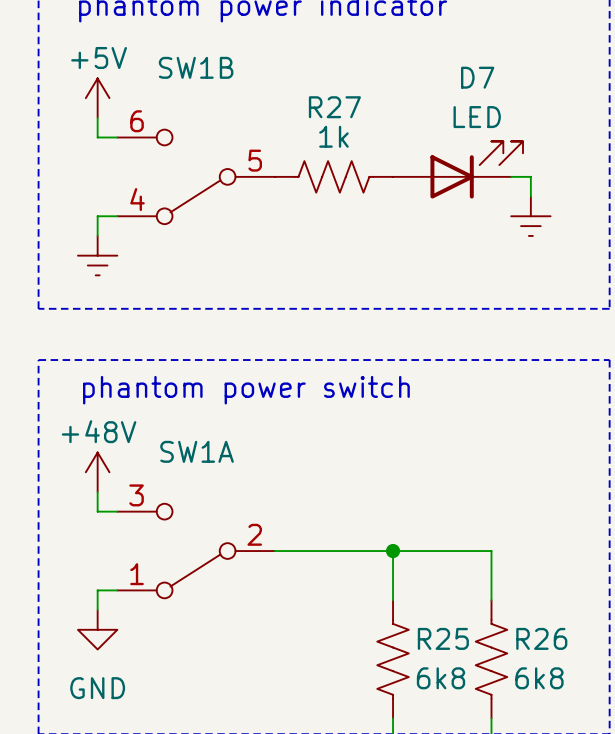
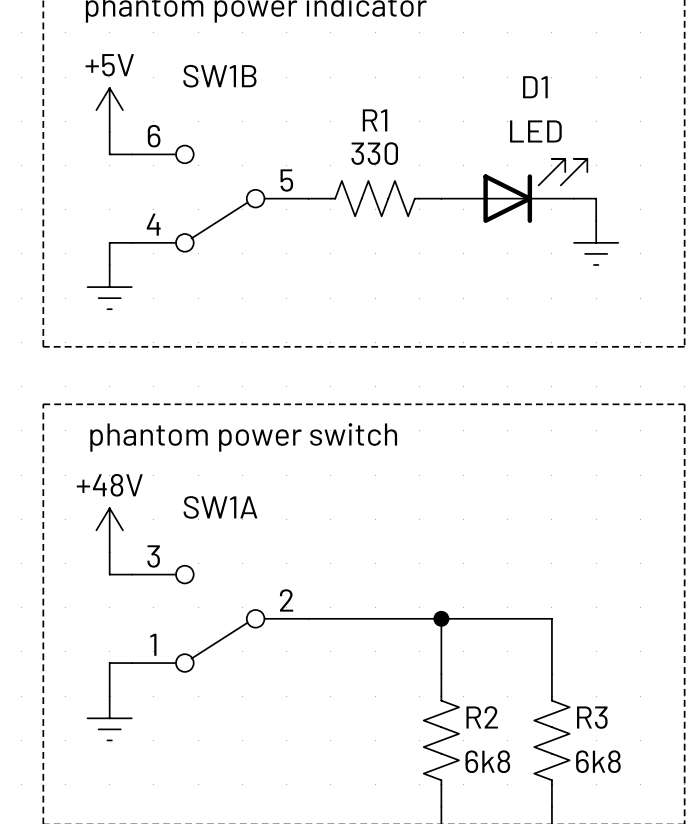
D7 name: D7 (477, 77) -> D1 (535, 87)
R27 name: R27 (334, 107) -> R1 (375, 120)
R27 value: 1k (333, 136) -> 330 (374, 153)
power symbol shape: [77, 610, 118, 650] -> [87, 696, 132, 741]
R25 name: R25 (443, 638) -> R2 (482, 717)
R26 name: R26 (541, 638) -> R3 (592, 717)
power symbol text: GND (97, 688) -> none

